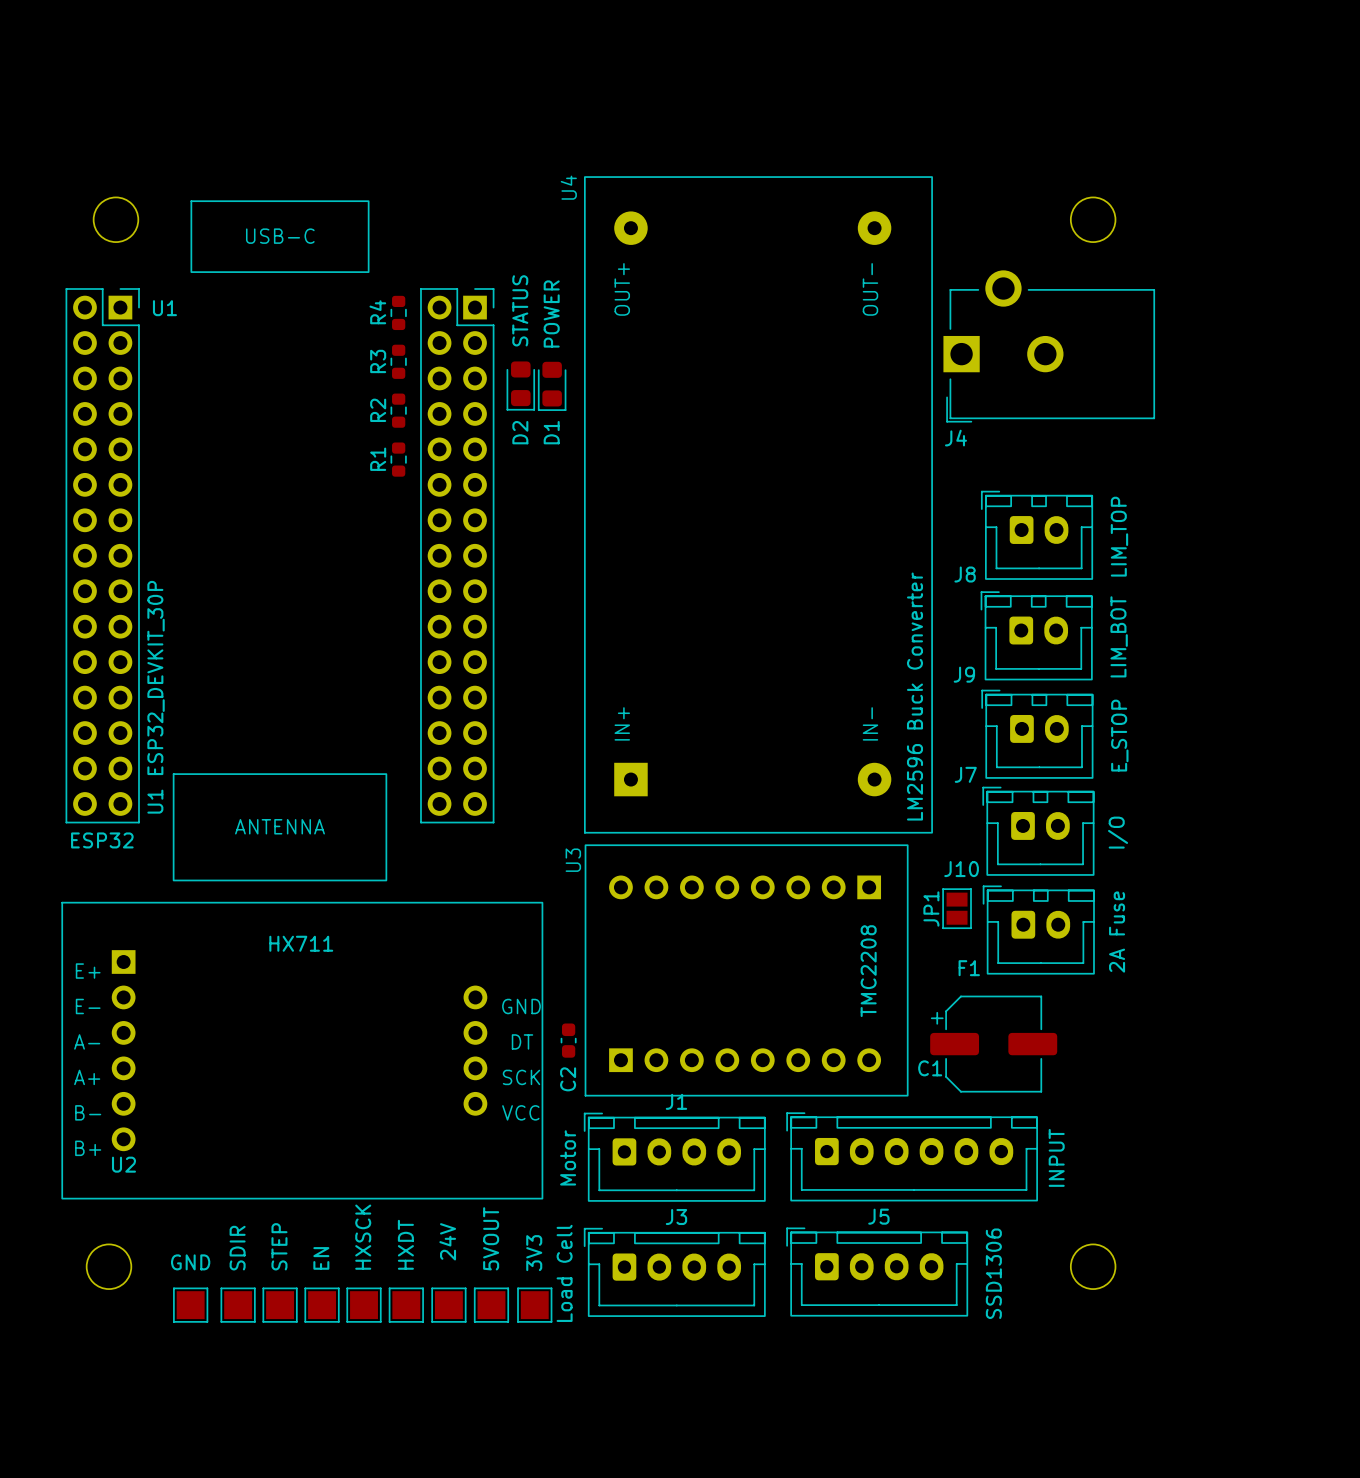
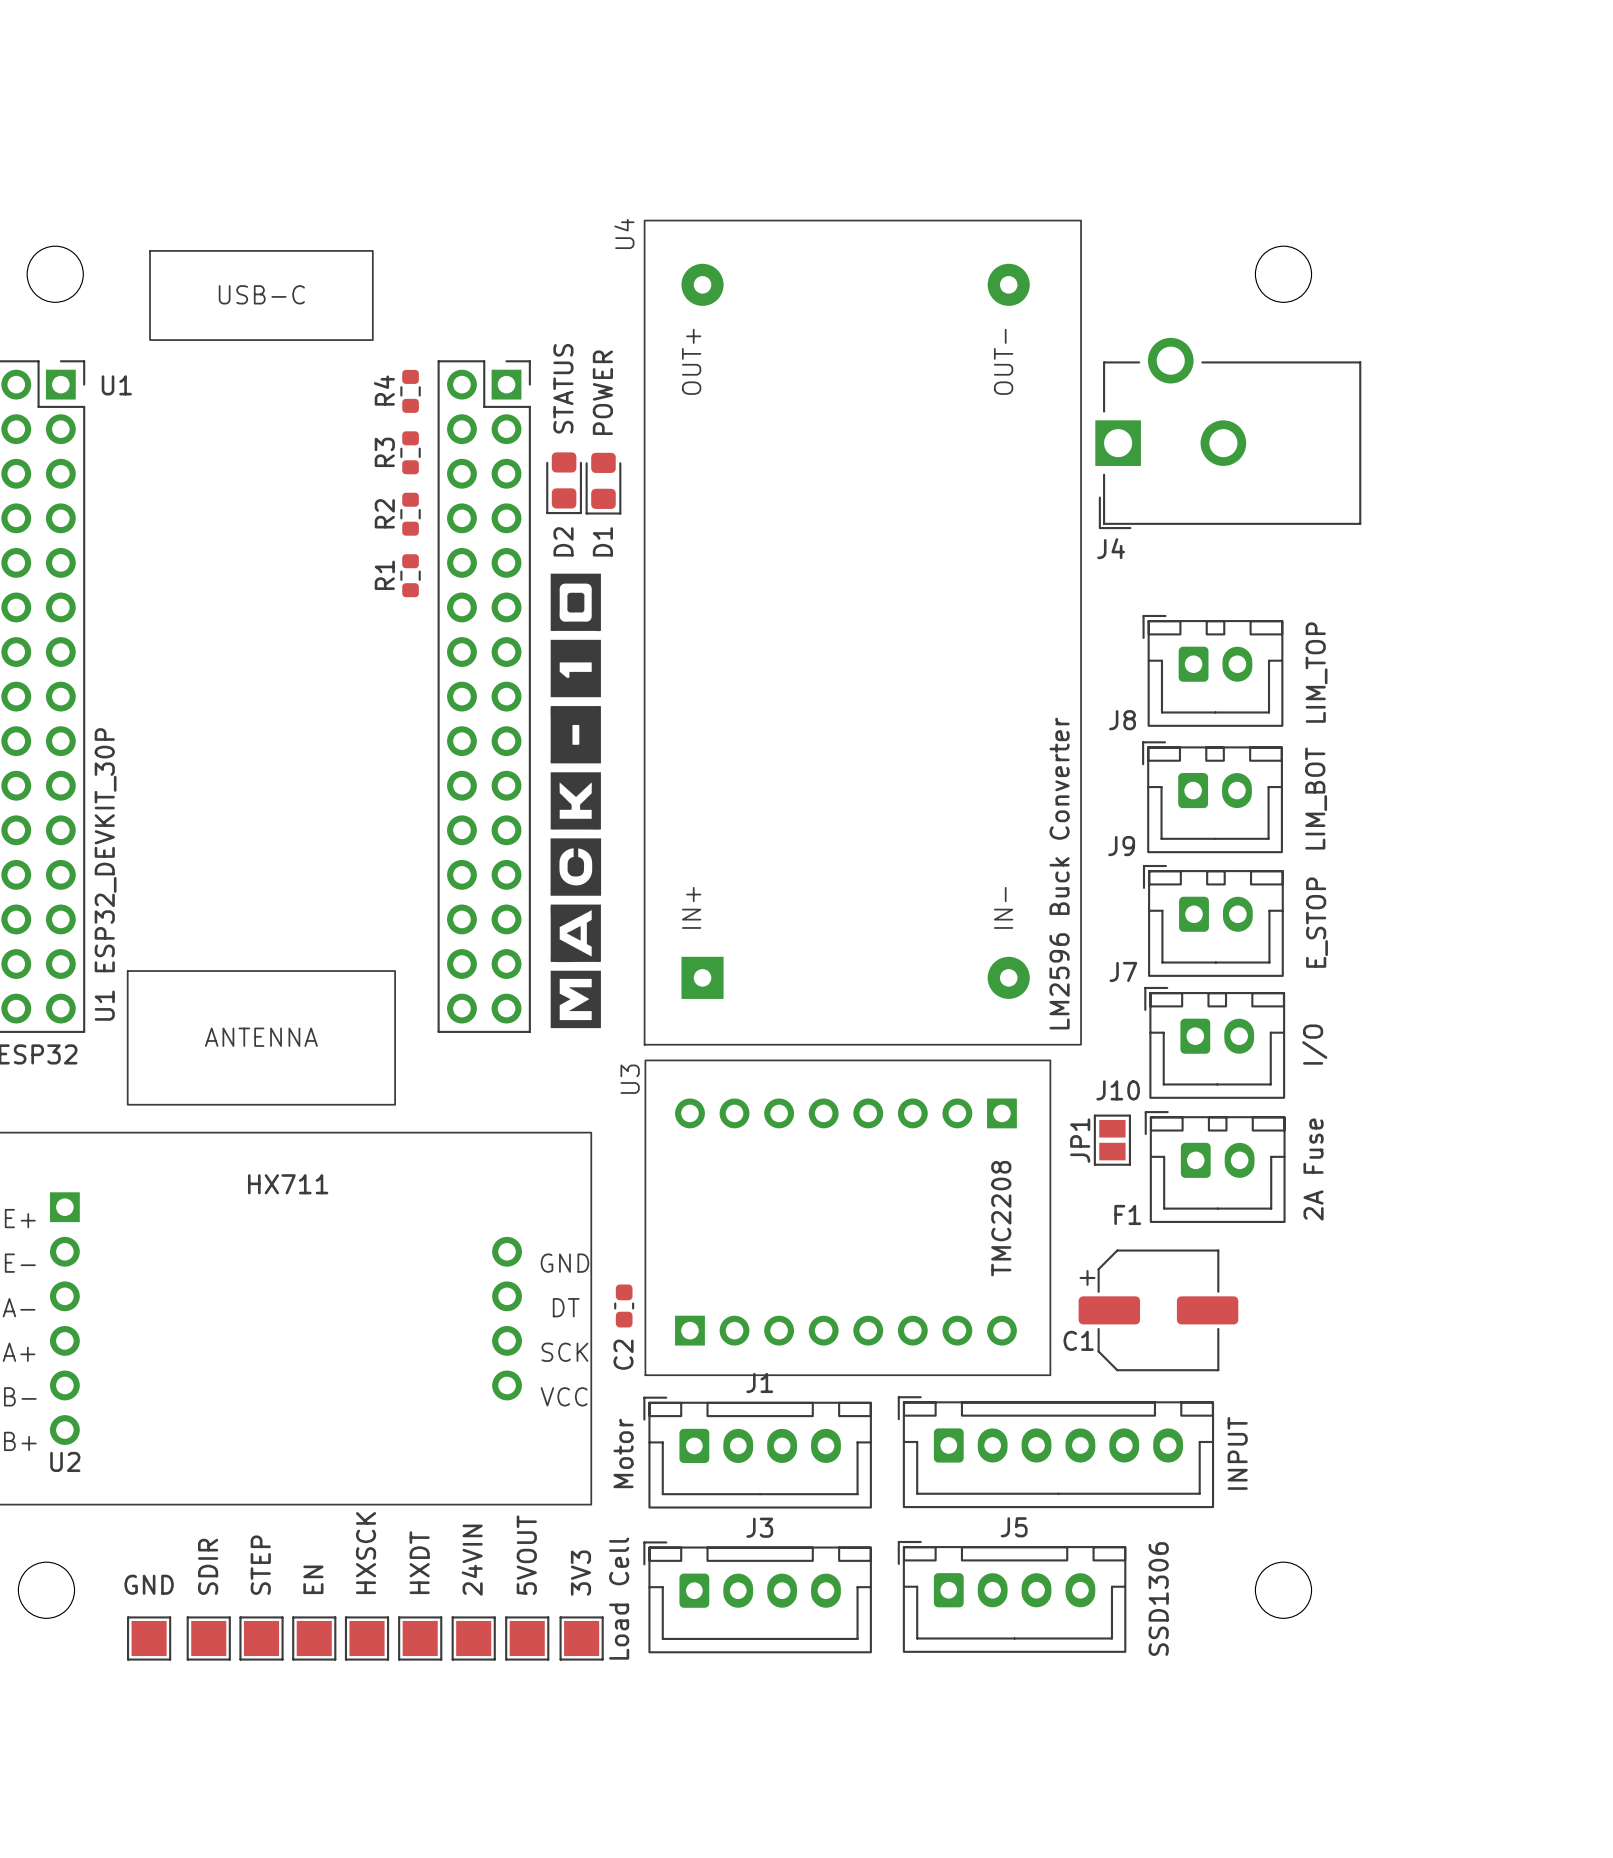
drawing: none -> [550, 573, 602, 1029]
part value: 24V (447, 1241) -> 24VIN (472, 1560)

